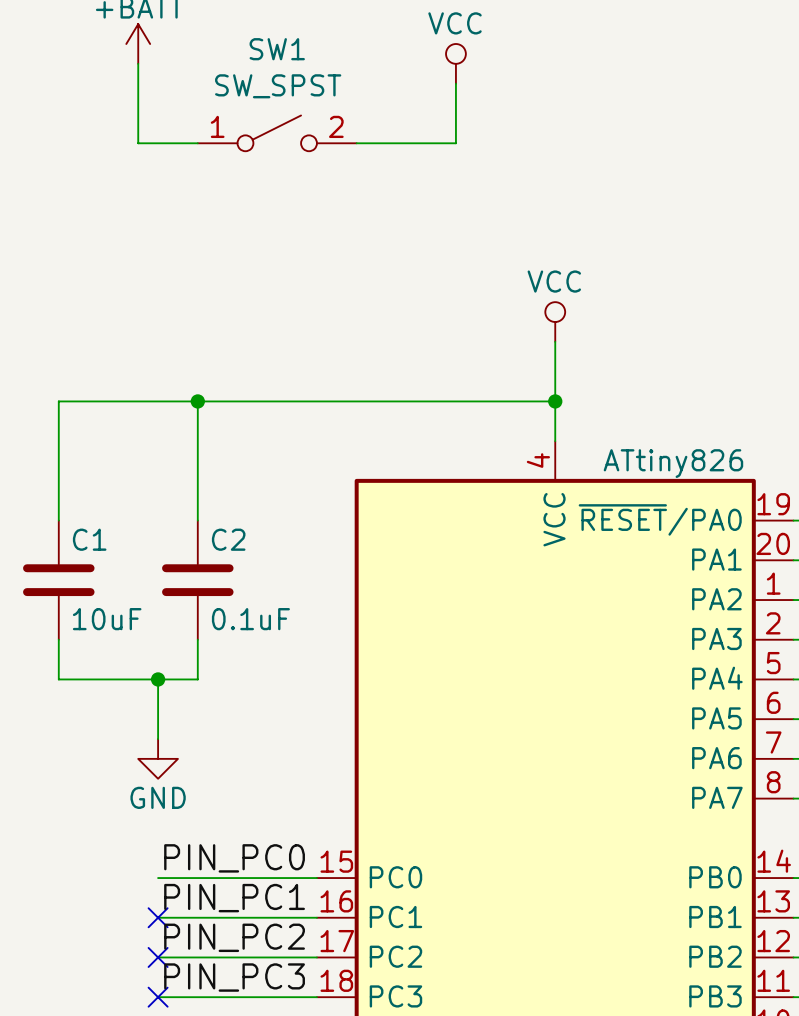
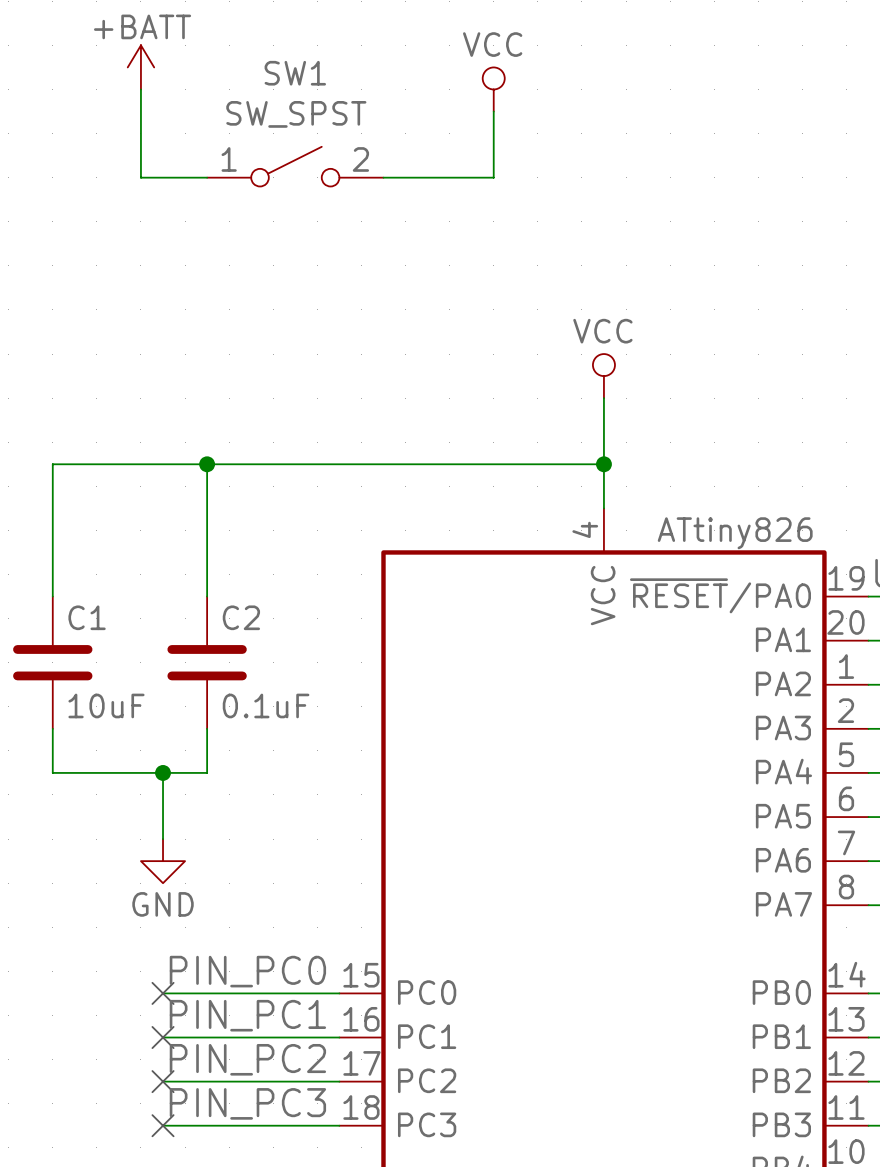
no-connect mark: none -> (163, 993)

